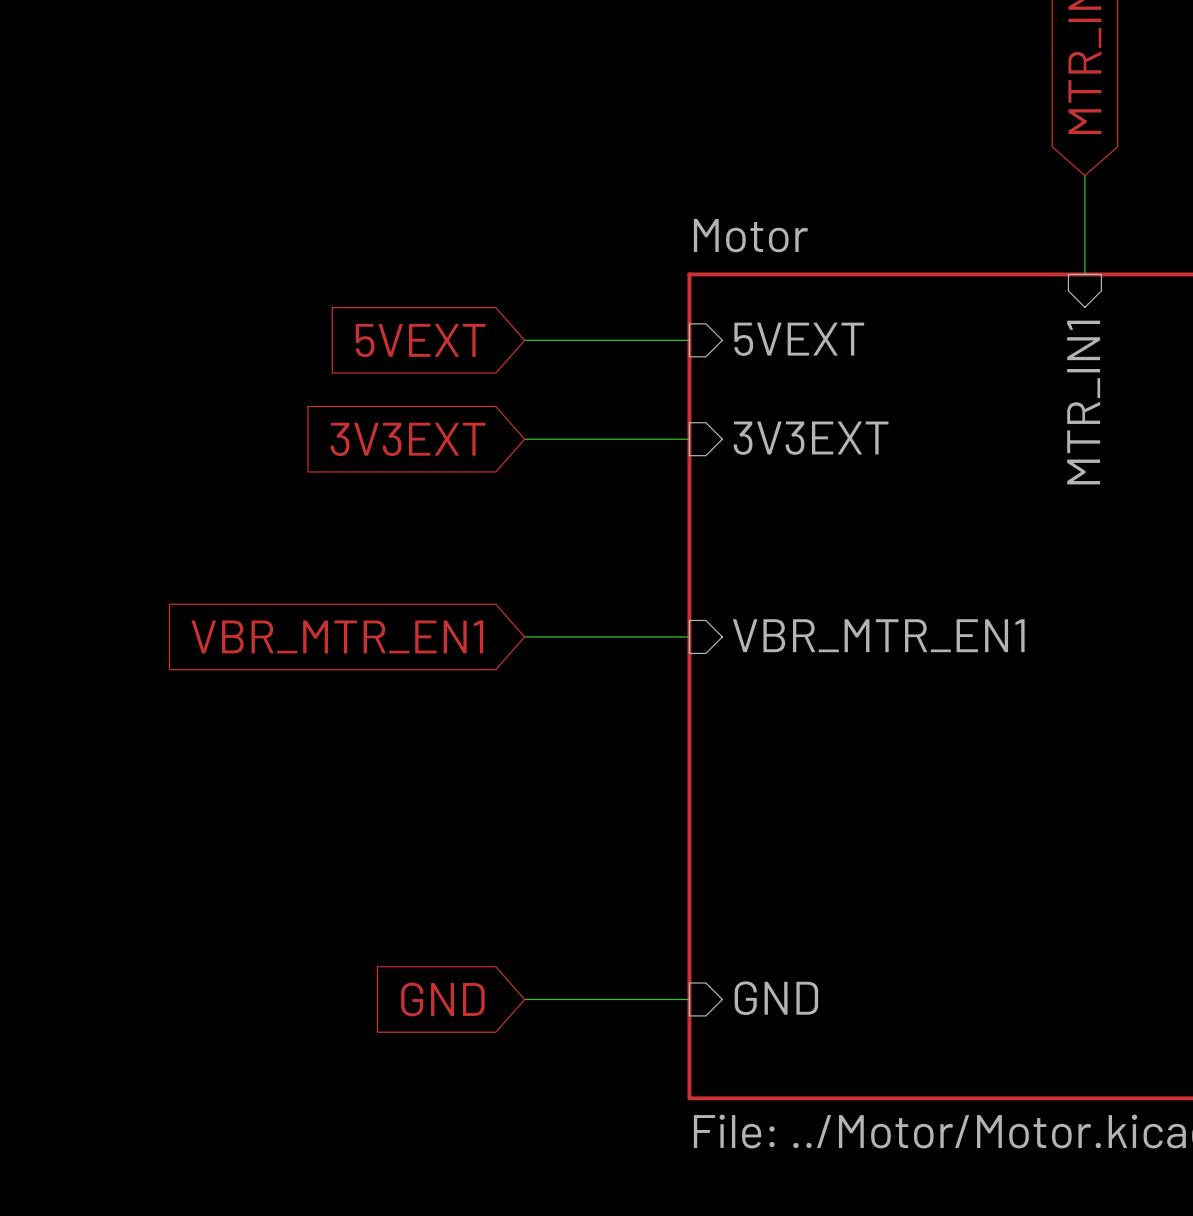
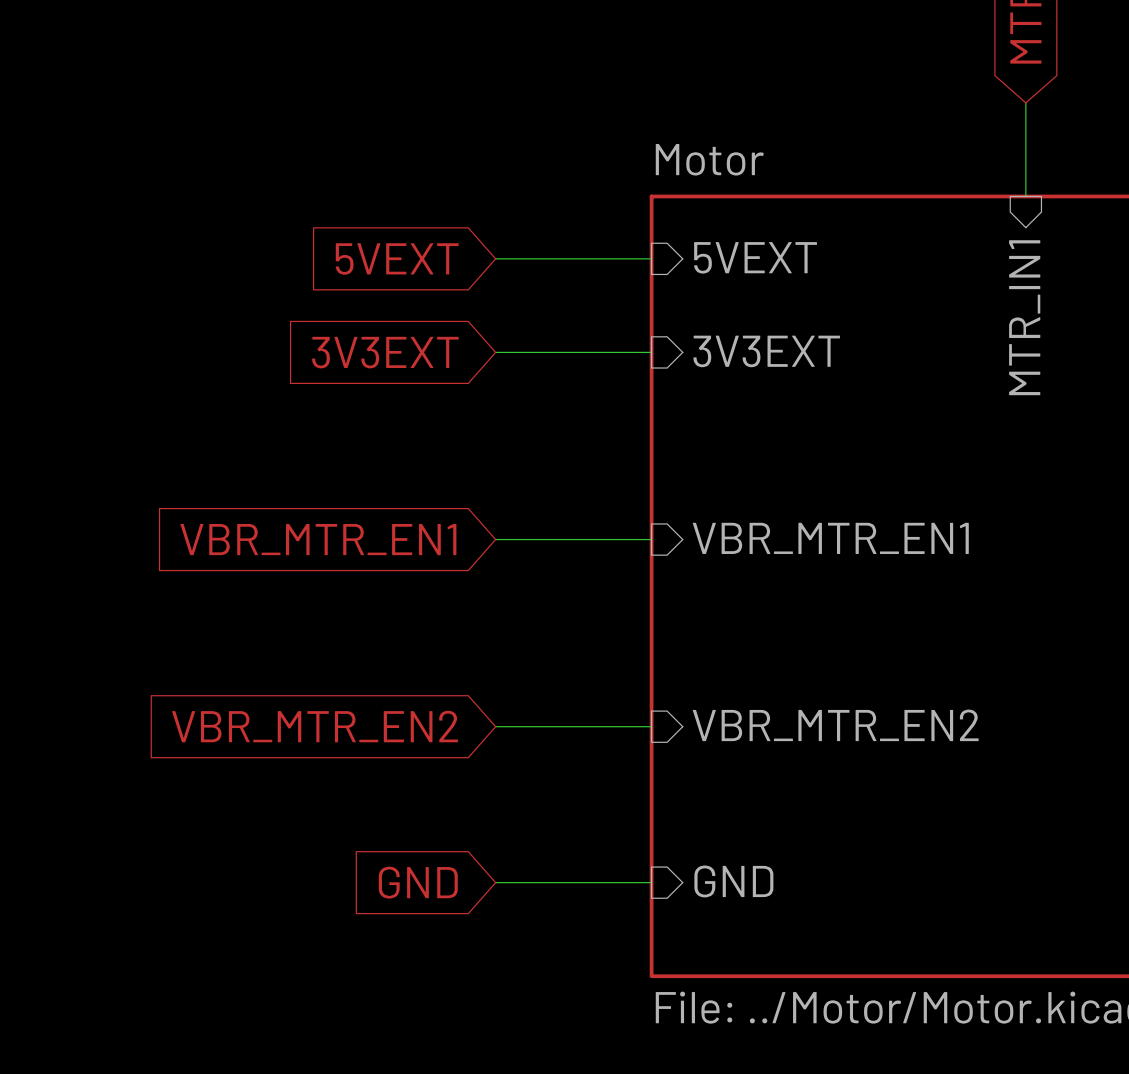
sheet pin: none -> VBR_MTR_EN2 (835, 725)
global label: none -> VBR_MTR_EN2 (315, 726)
wire: none -> (495, 726) (651, 726)

